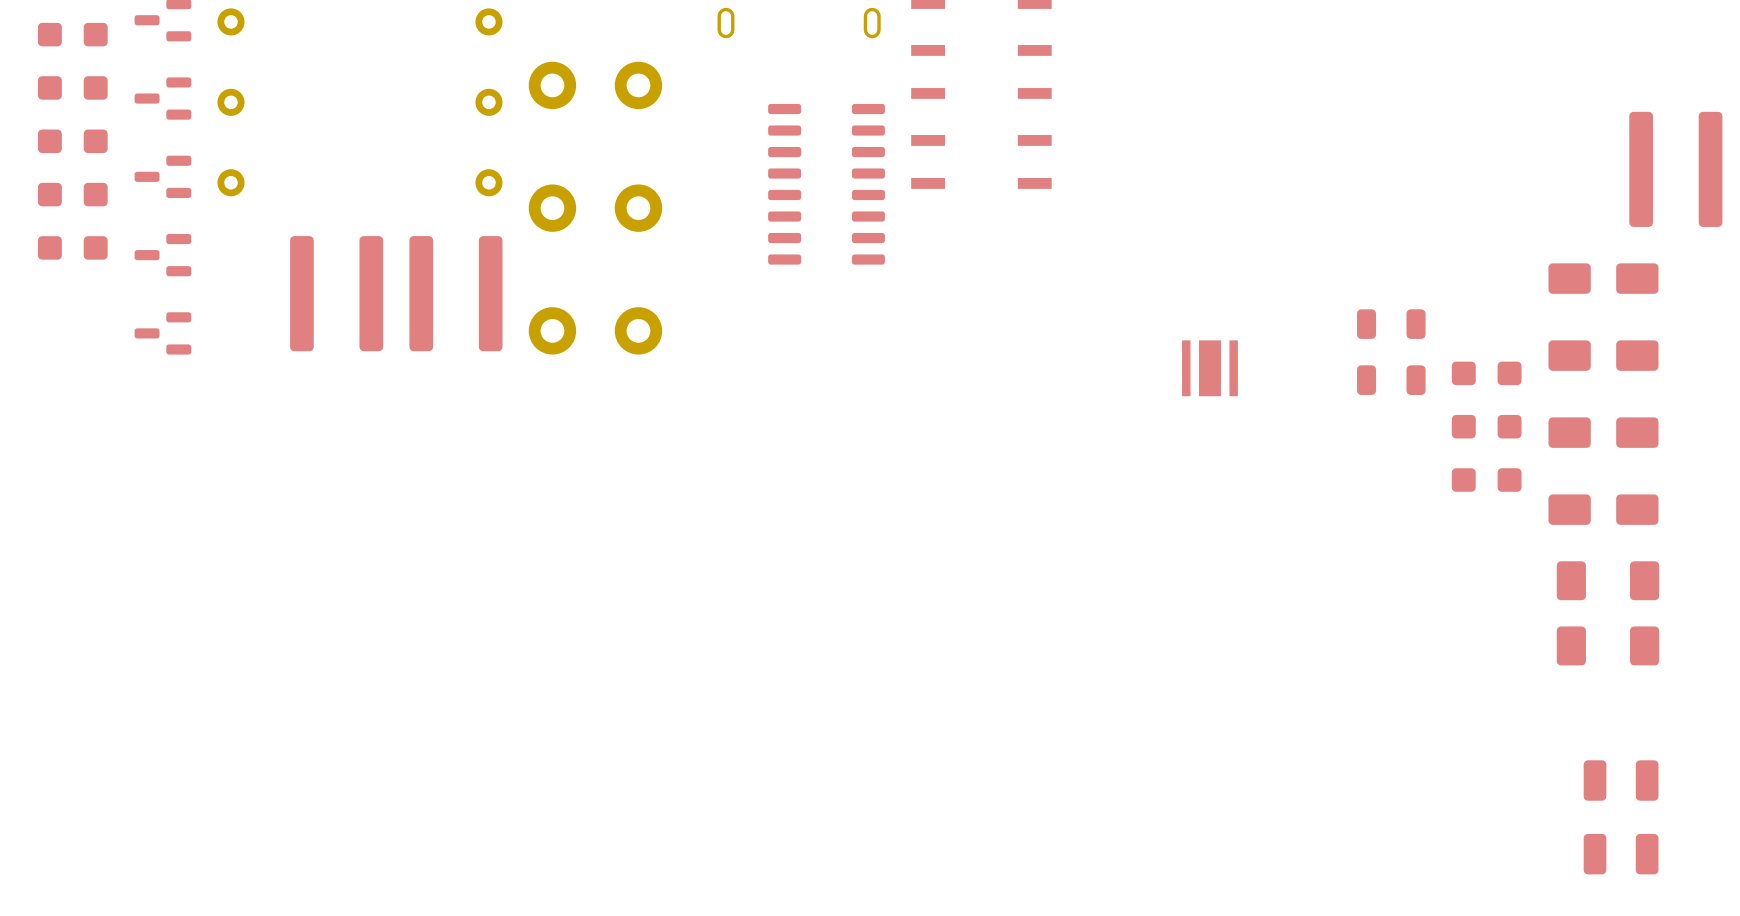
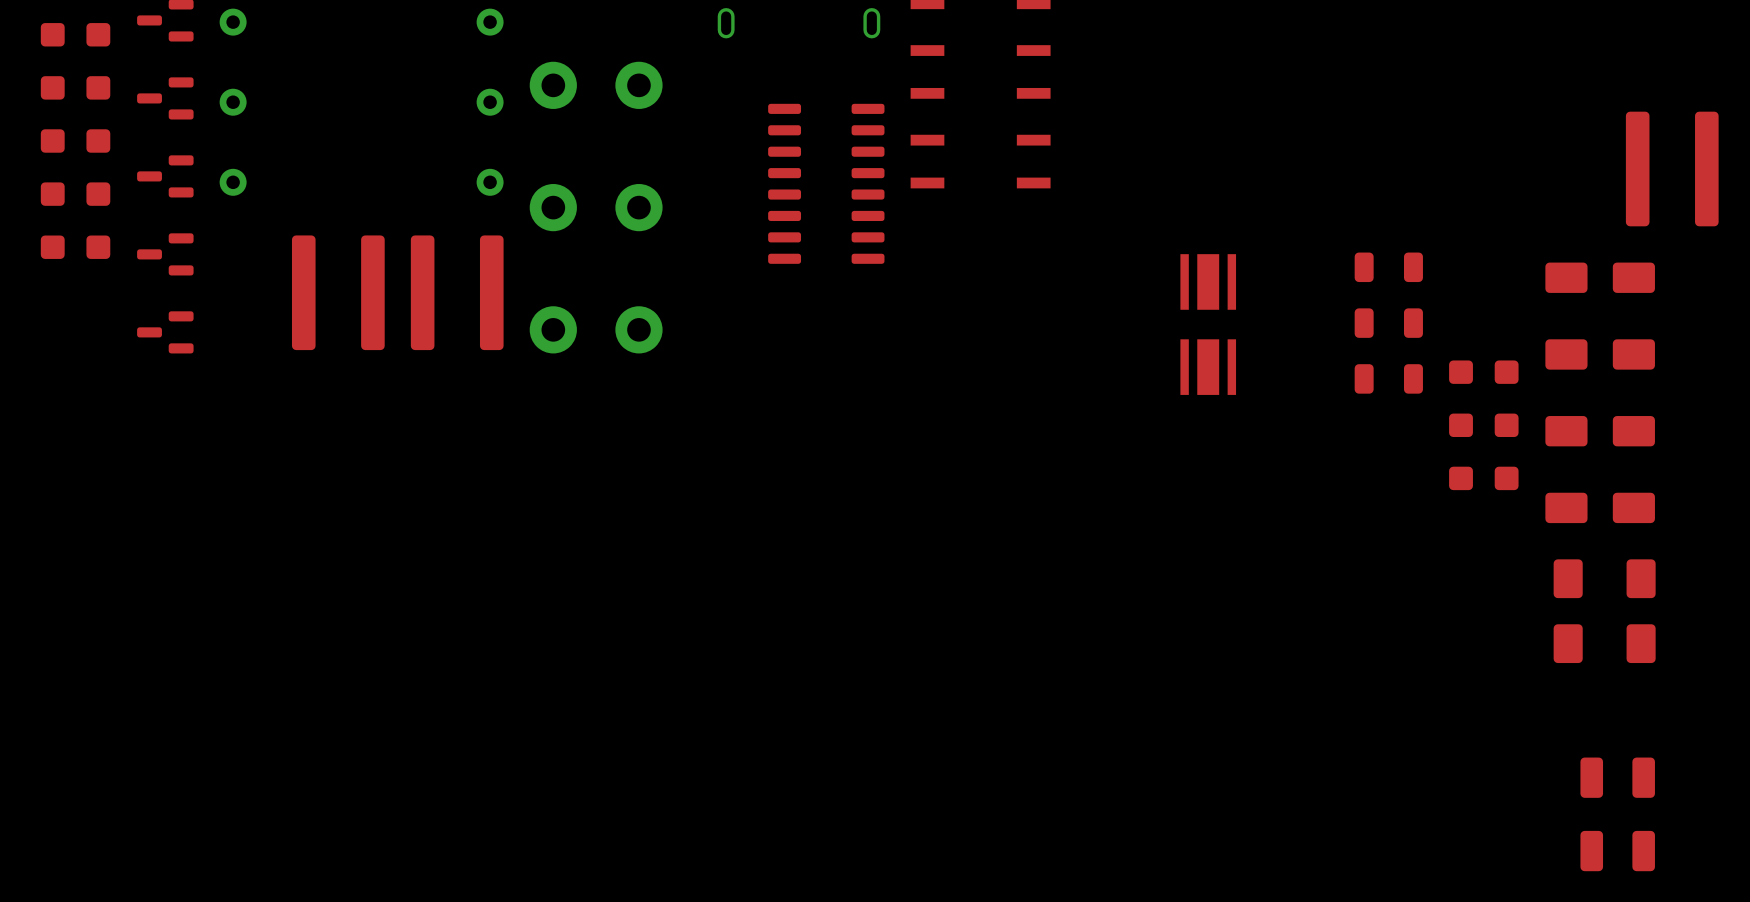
part: none -> (1388, 267)
part: none -> (1208, 281)

